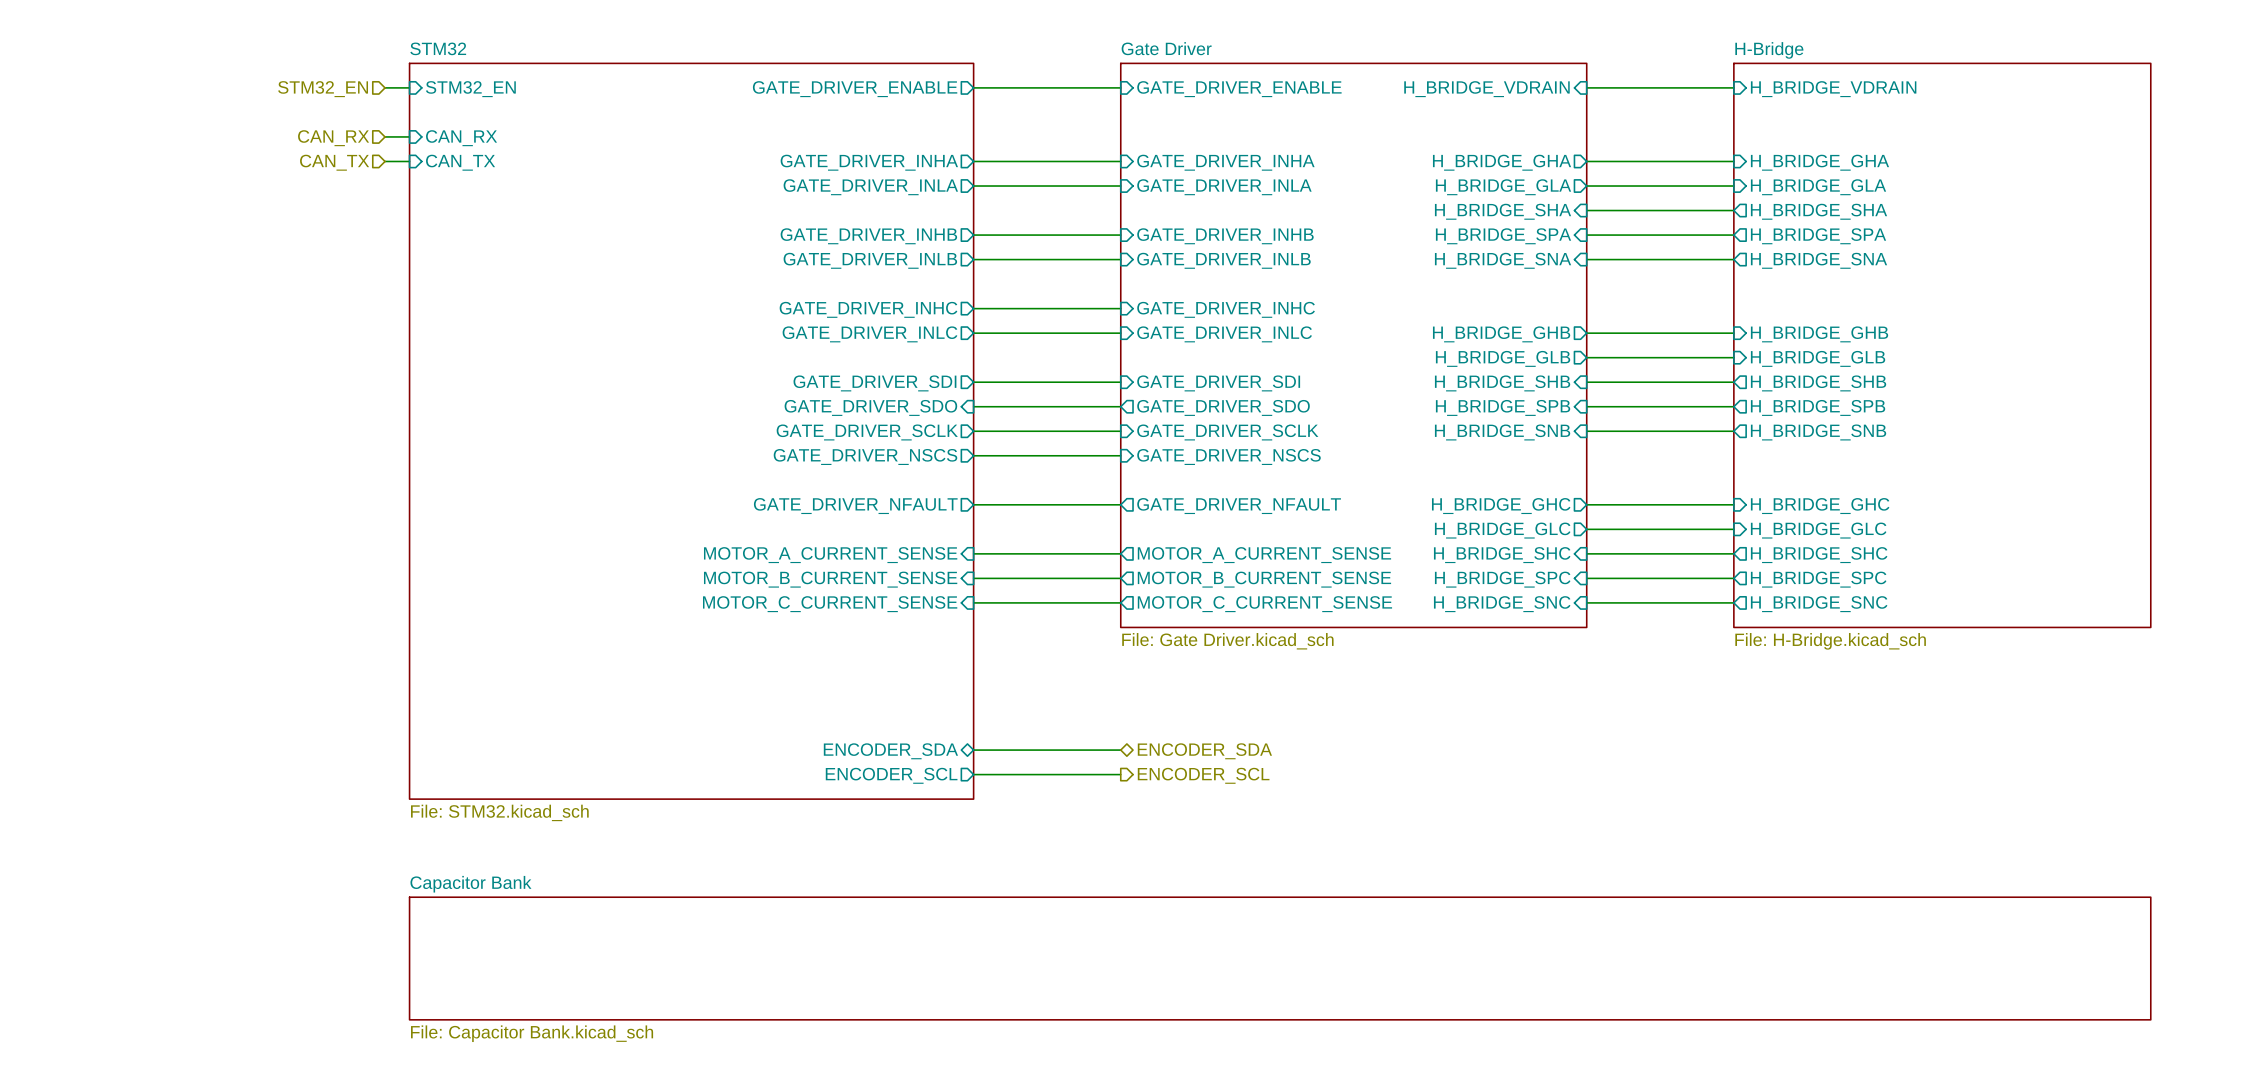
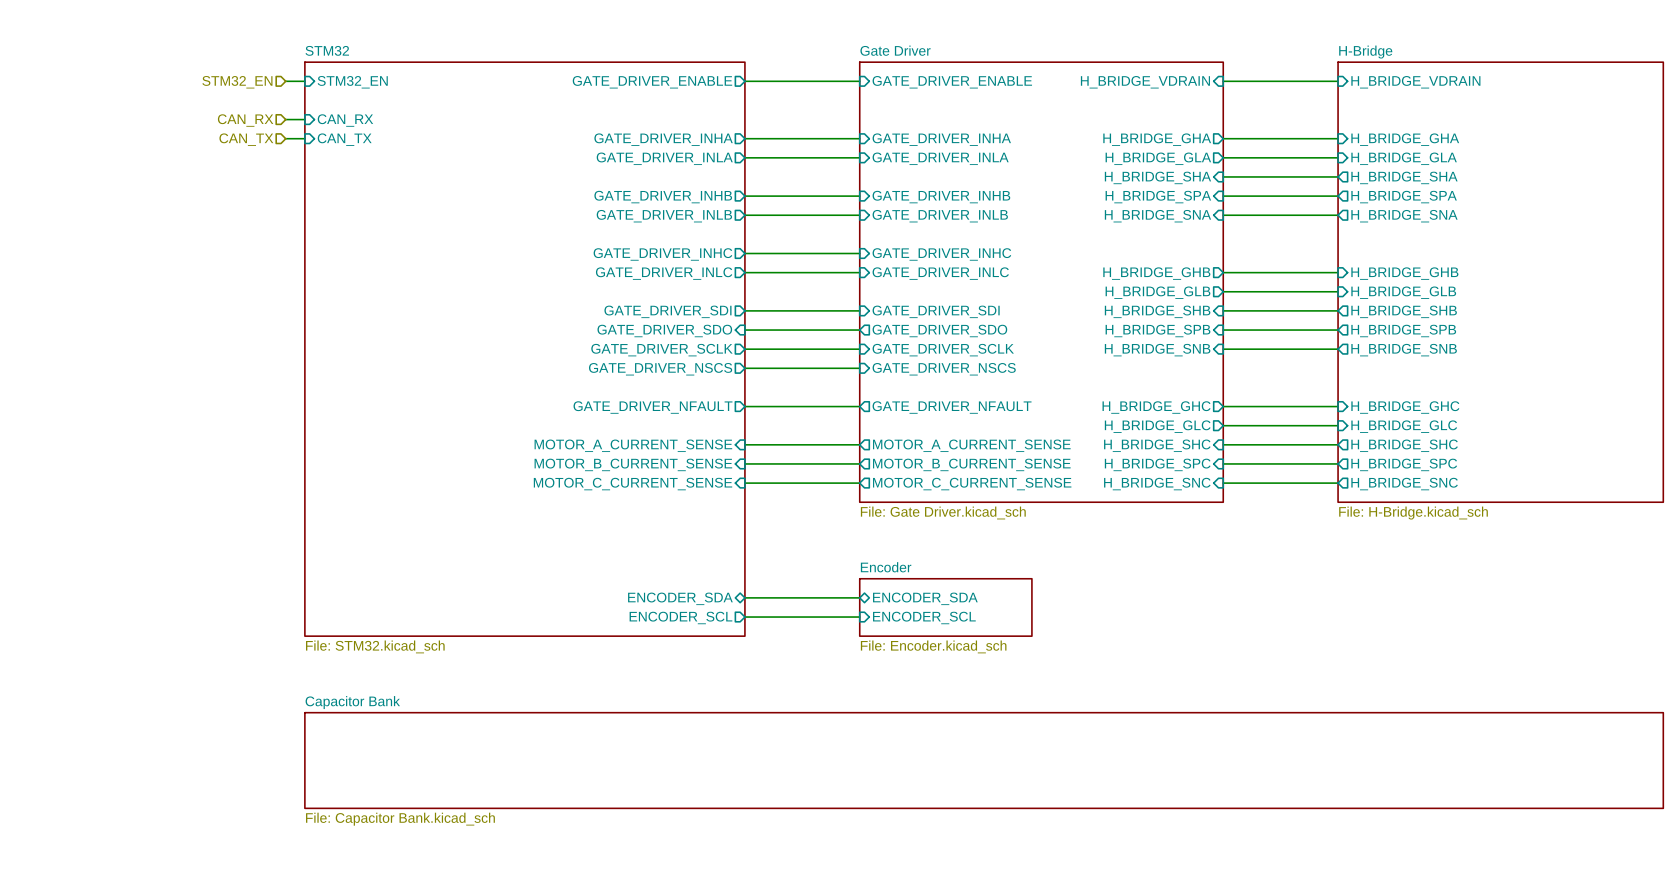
hierarchical label: ENCODER_SDA (1204, 751) -> none
sheet pin: none -> ENCODER_SDA (925, 598)
sheet Encoder: none -> File: Encoder.kicad_sch (945, 607)
hierarchical label: ENCODER_SCL (1203, 775) -> none
sheet pin: none -> ENCODER_SCL (924, 617)

